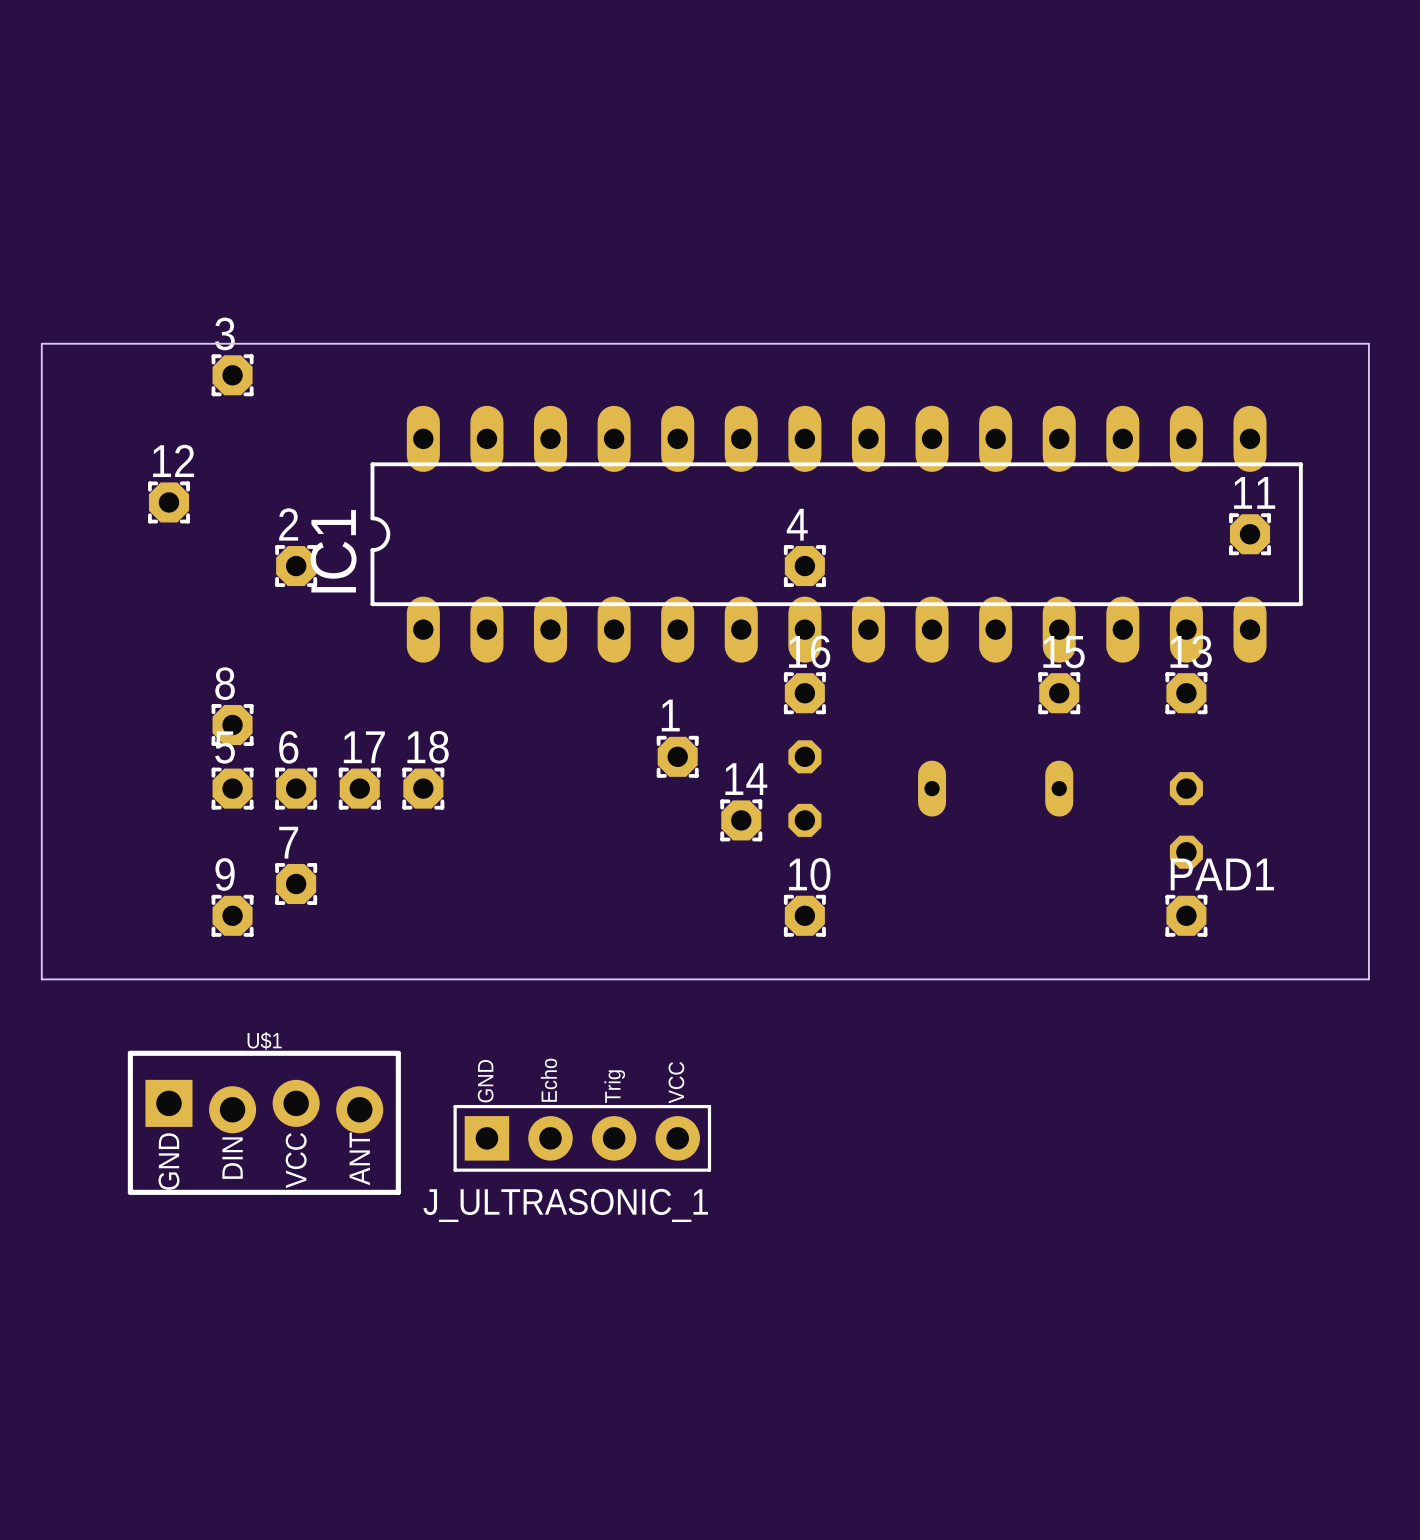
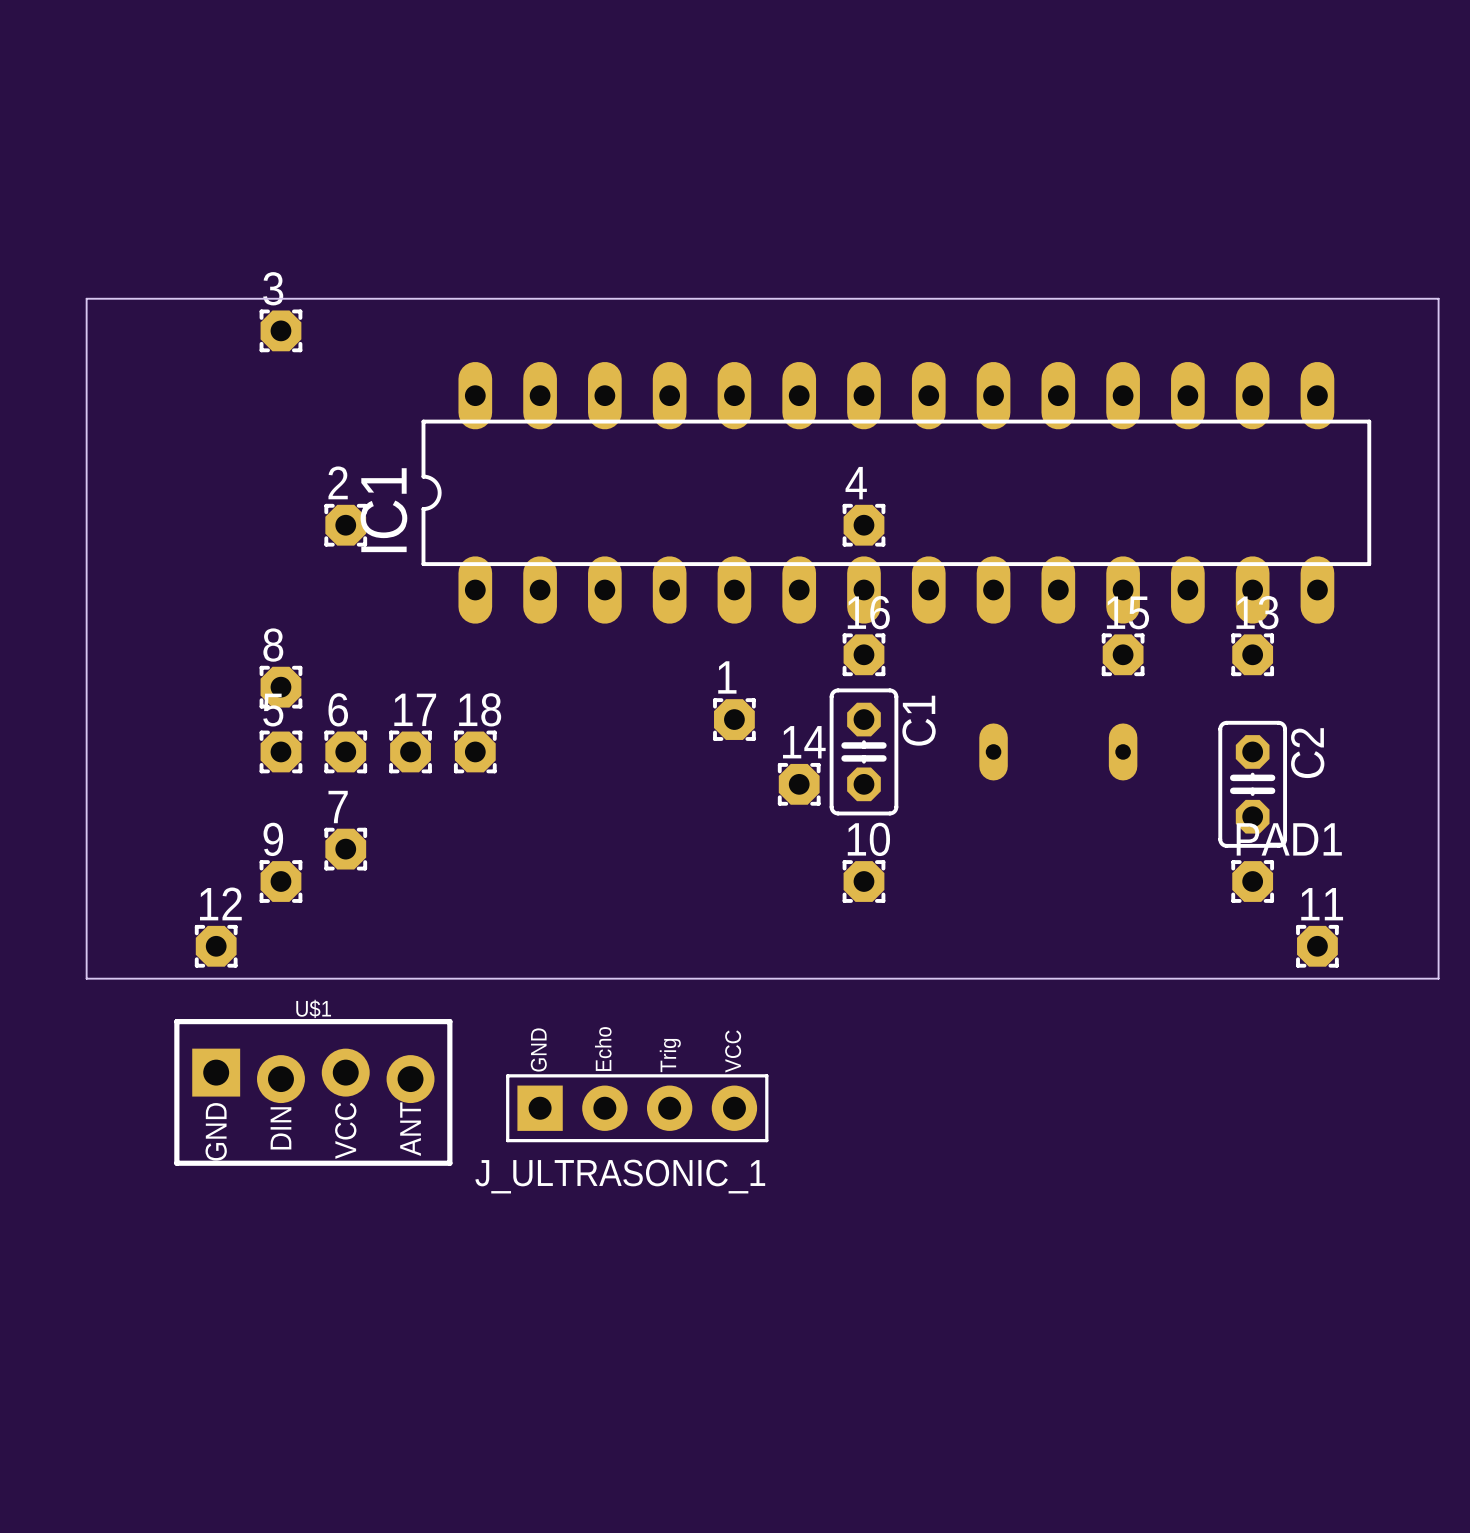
12 position: (168, 502) -> (216, 946)
11 position: (1250, 534) -> (1317, 946)
C1 side: bottom (804, 788) -> top (863, 751)
C2 side: bottom (1186, 820) -> top (1252, 784)
board edge: (41, 979) (1368, 979) -> (86, 946) (86, 978) (1438, 978) (1438, 946)

